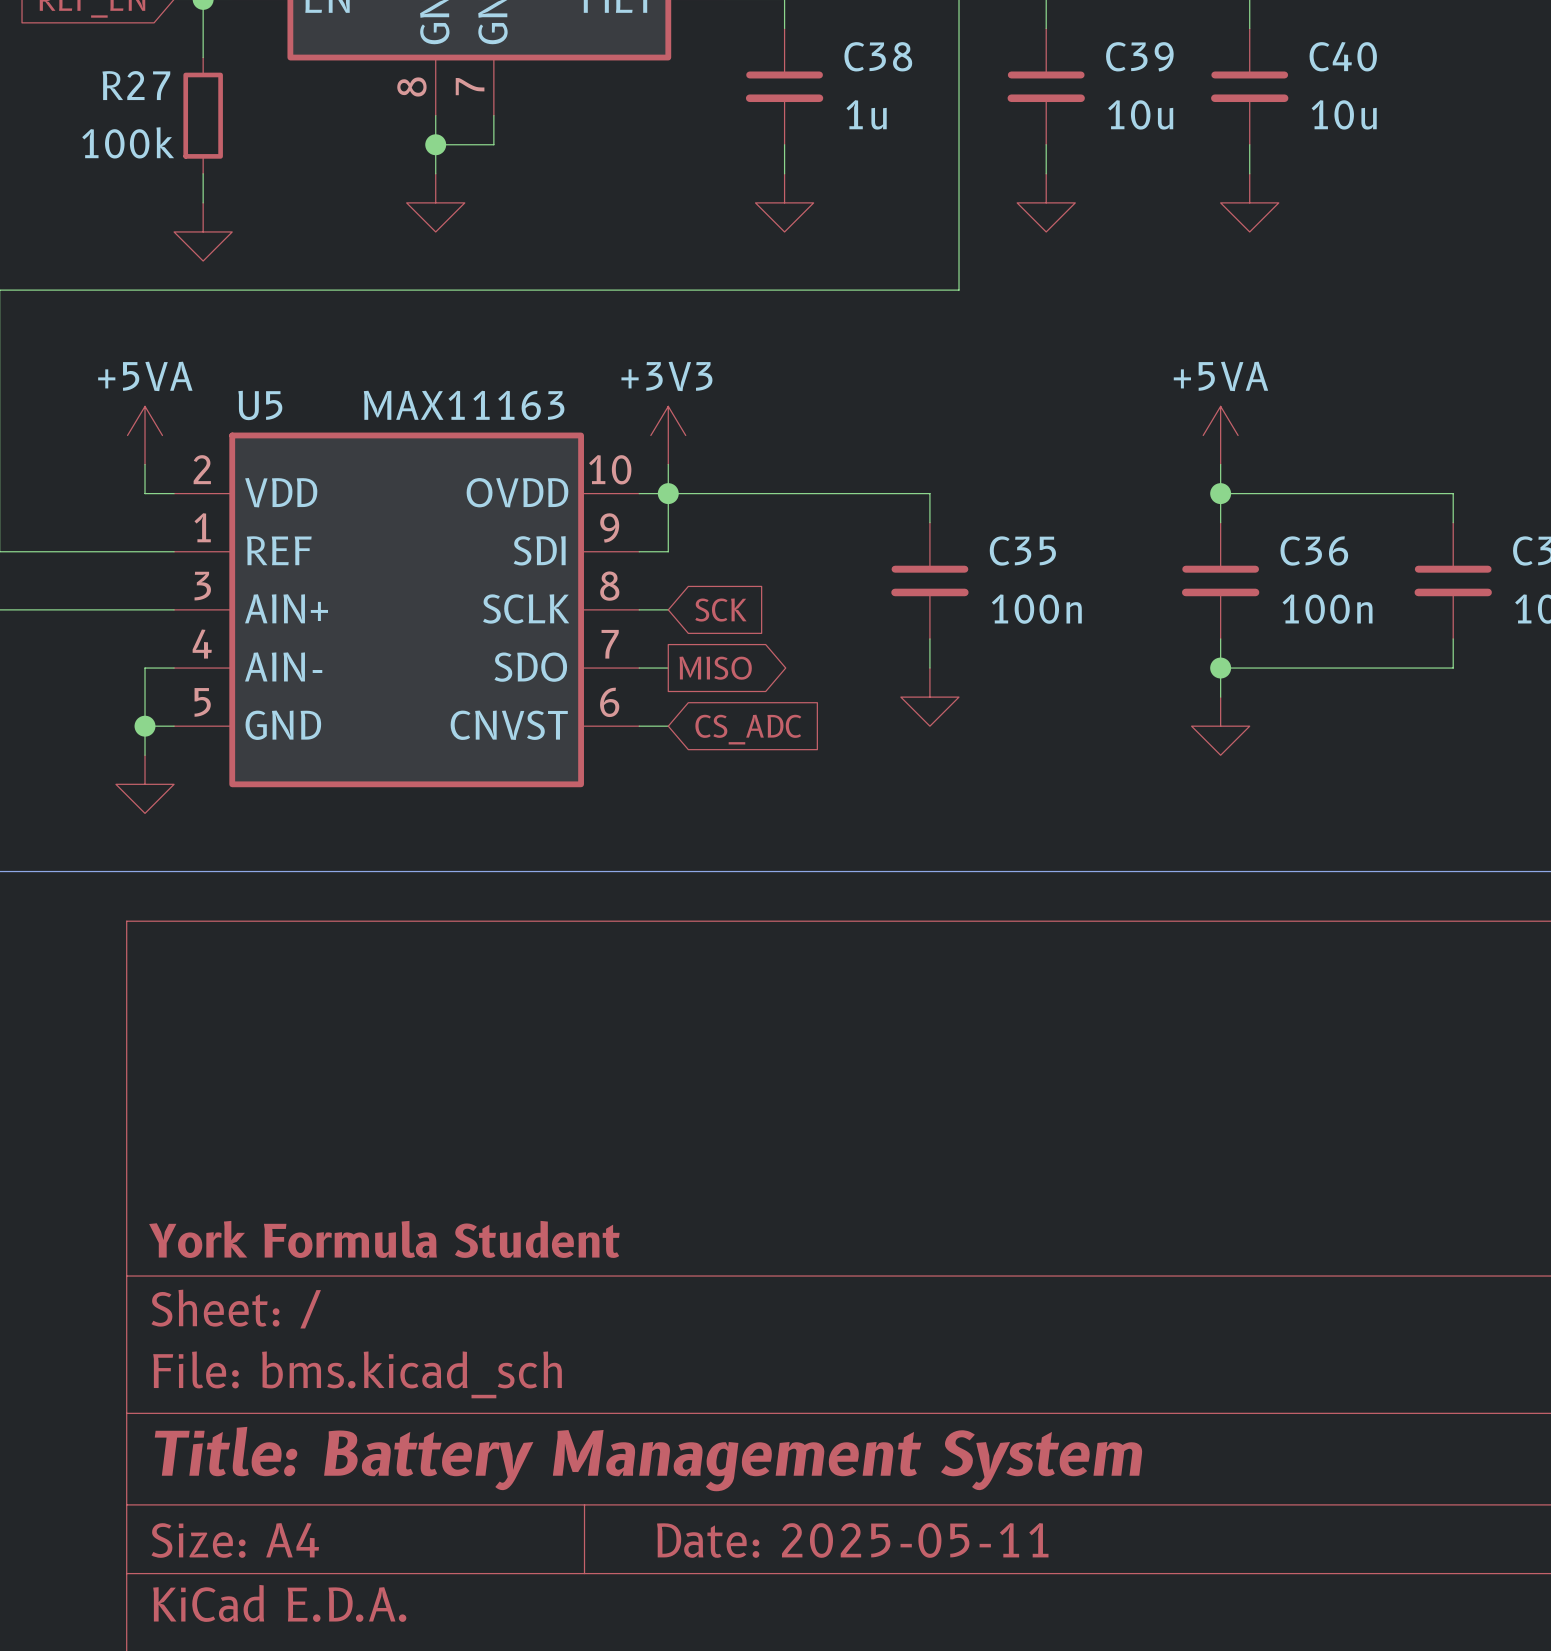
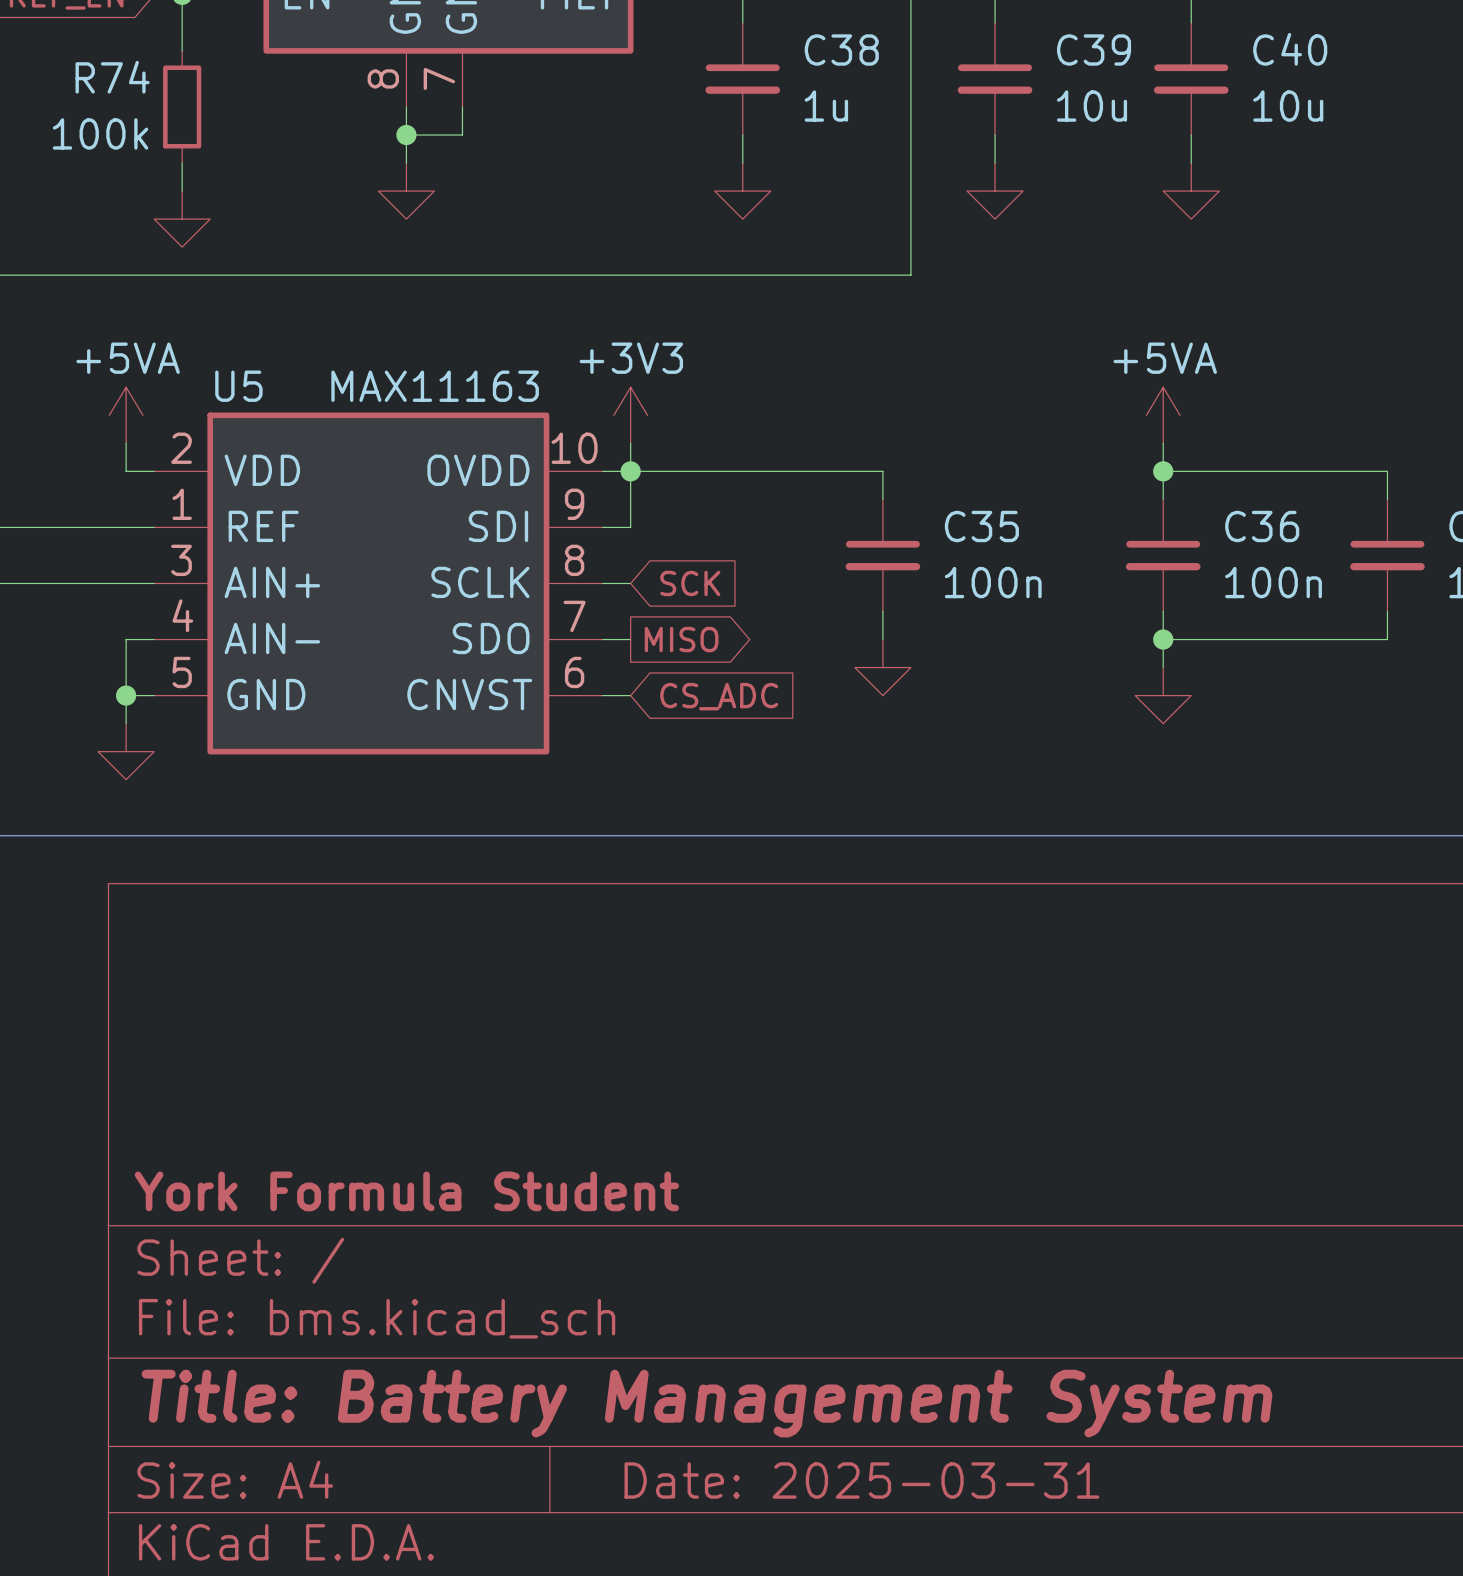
R27 name: R27 (136, 85) -> R74 (112, 77)
title block: Date: 2025-05-11 (852, 1540) -> Date: 2025-03-31 (861, 1480)

